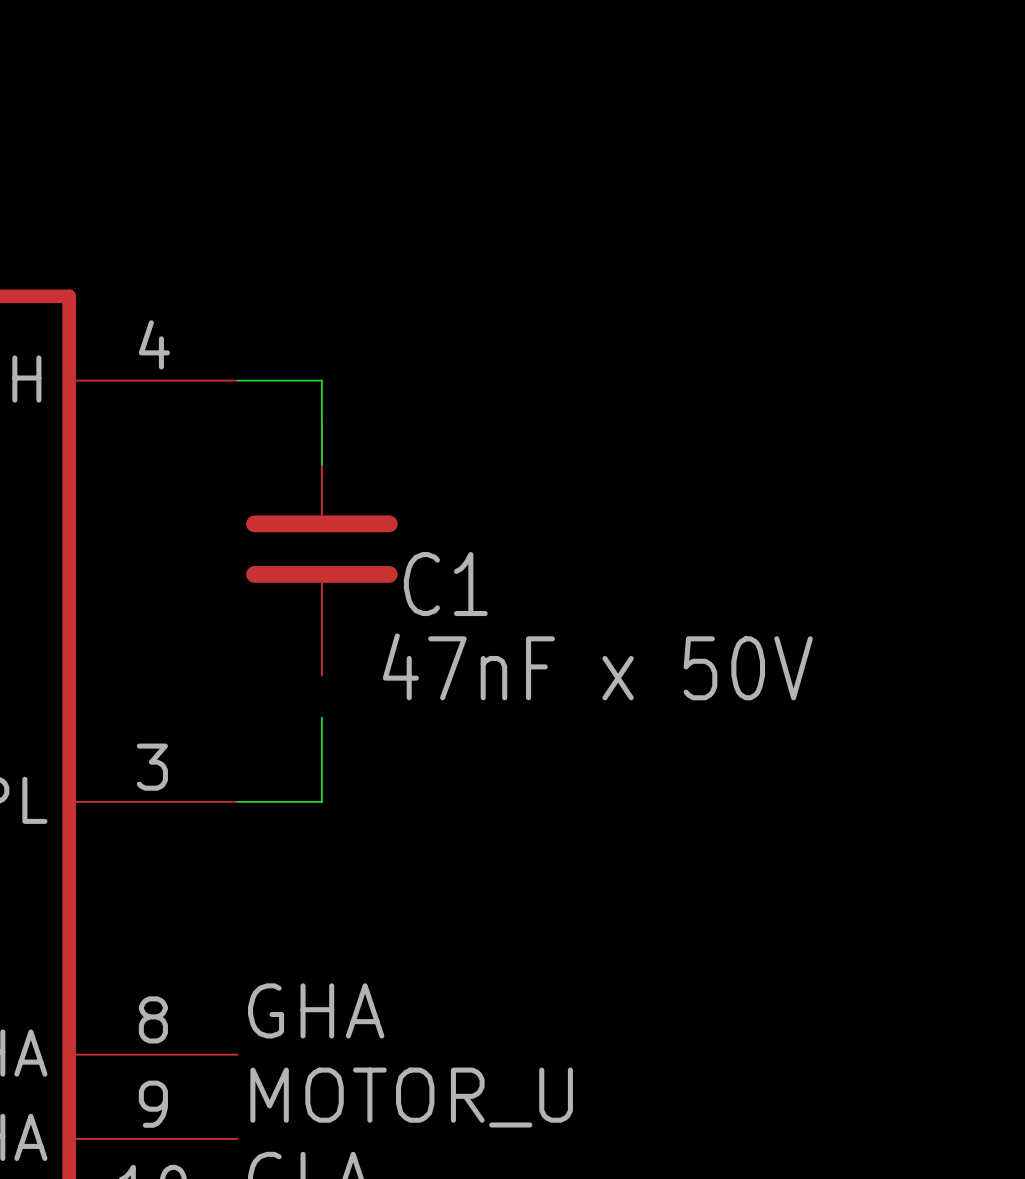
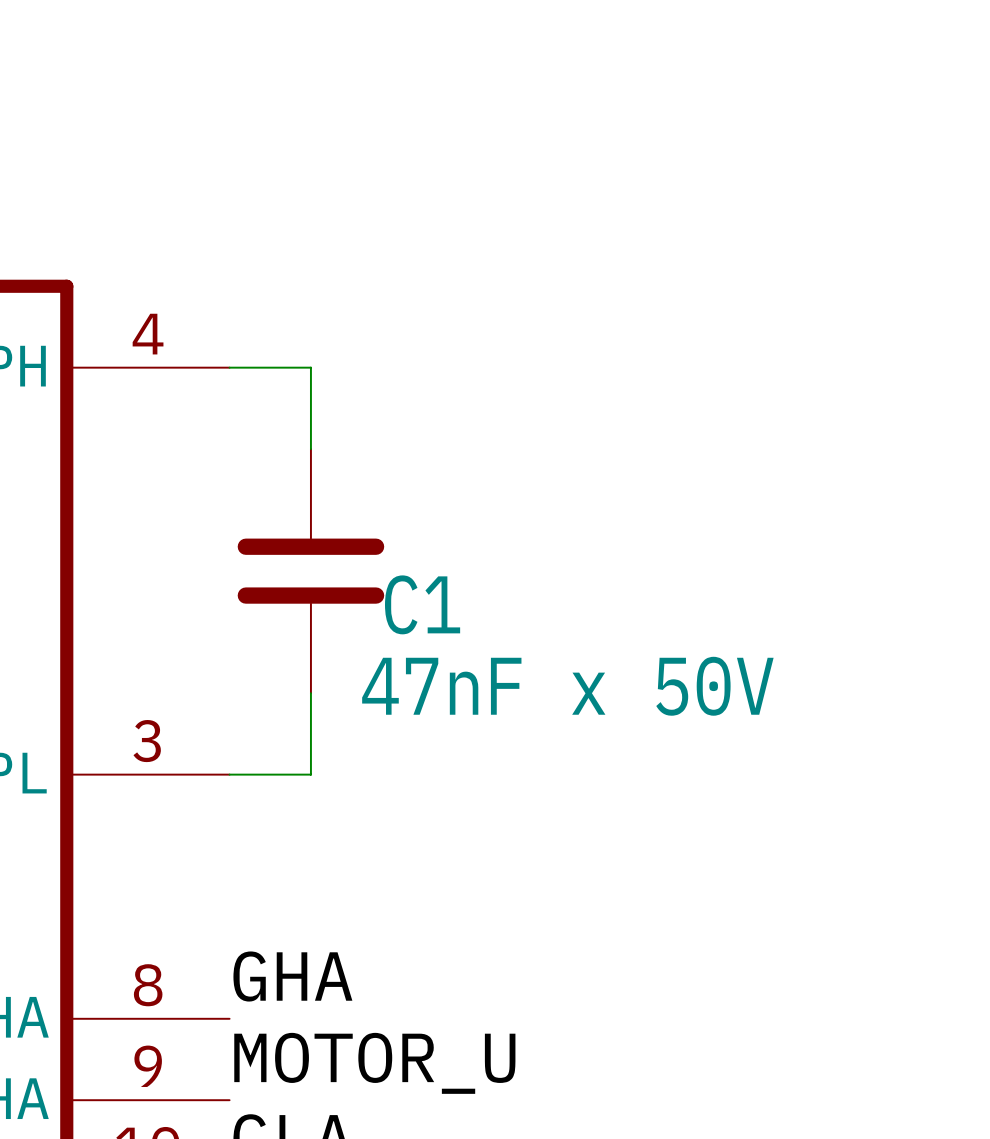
C1 position: (321, 549) -> (310, 571)

